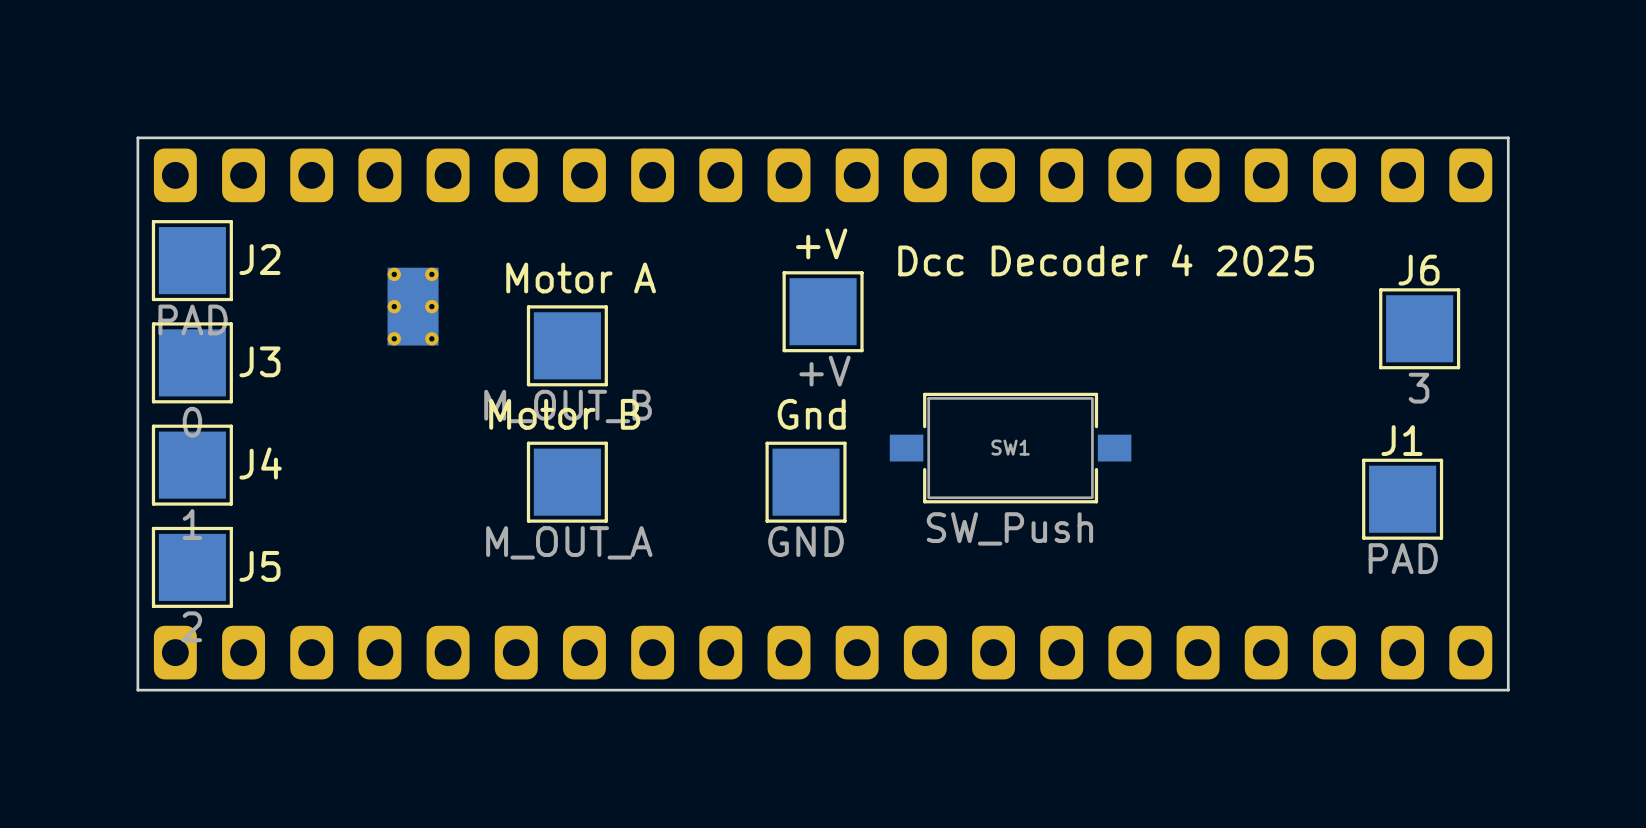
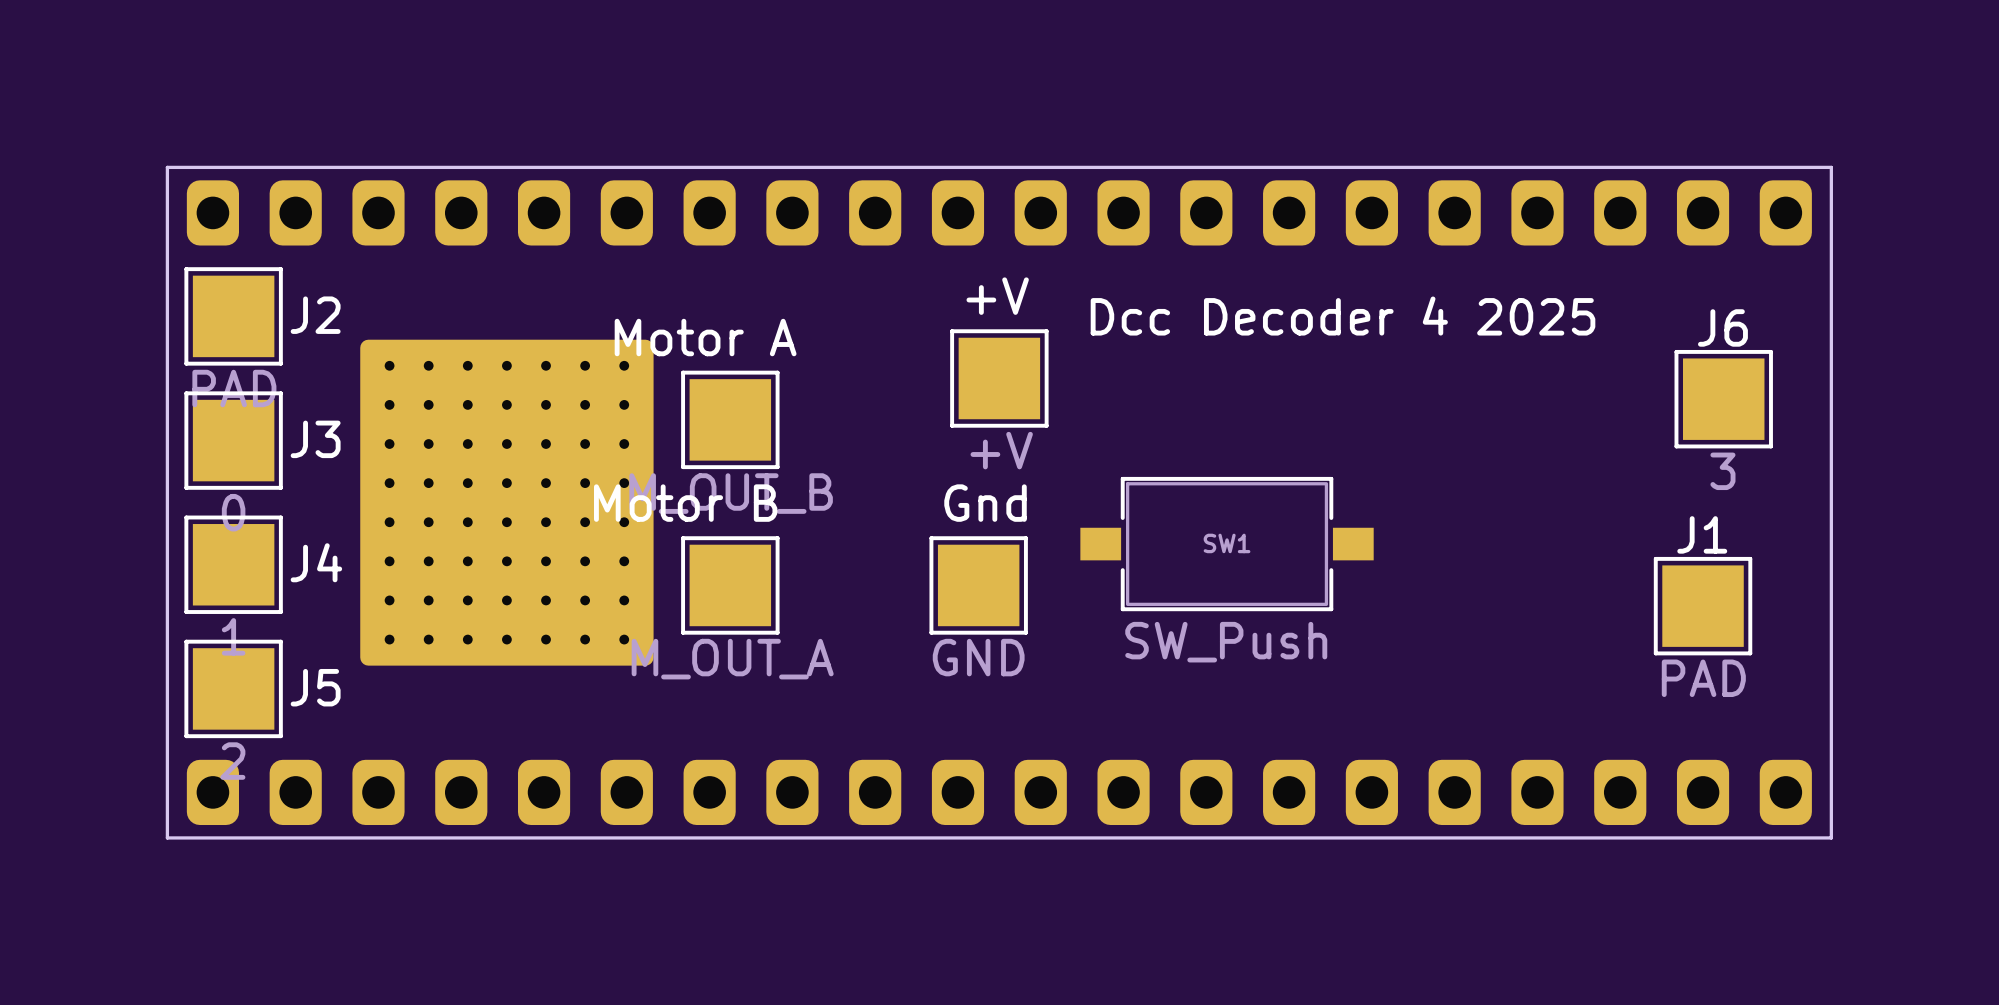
part: (413, 306) -> none
part position: (567, 345) -> (730, 419)
part: none -> (506, 502)
part position: (567, 482) -> (730, 585)

